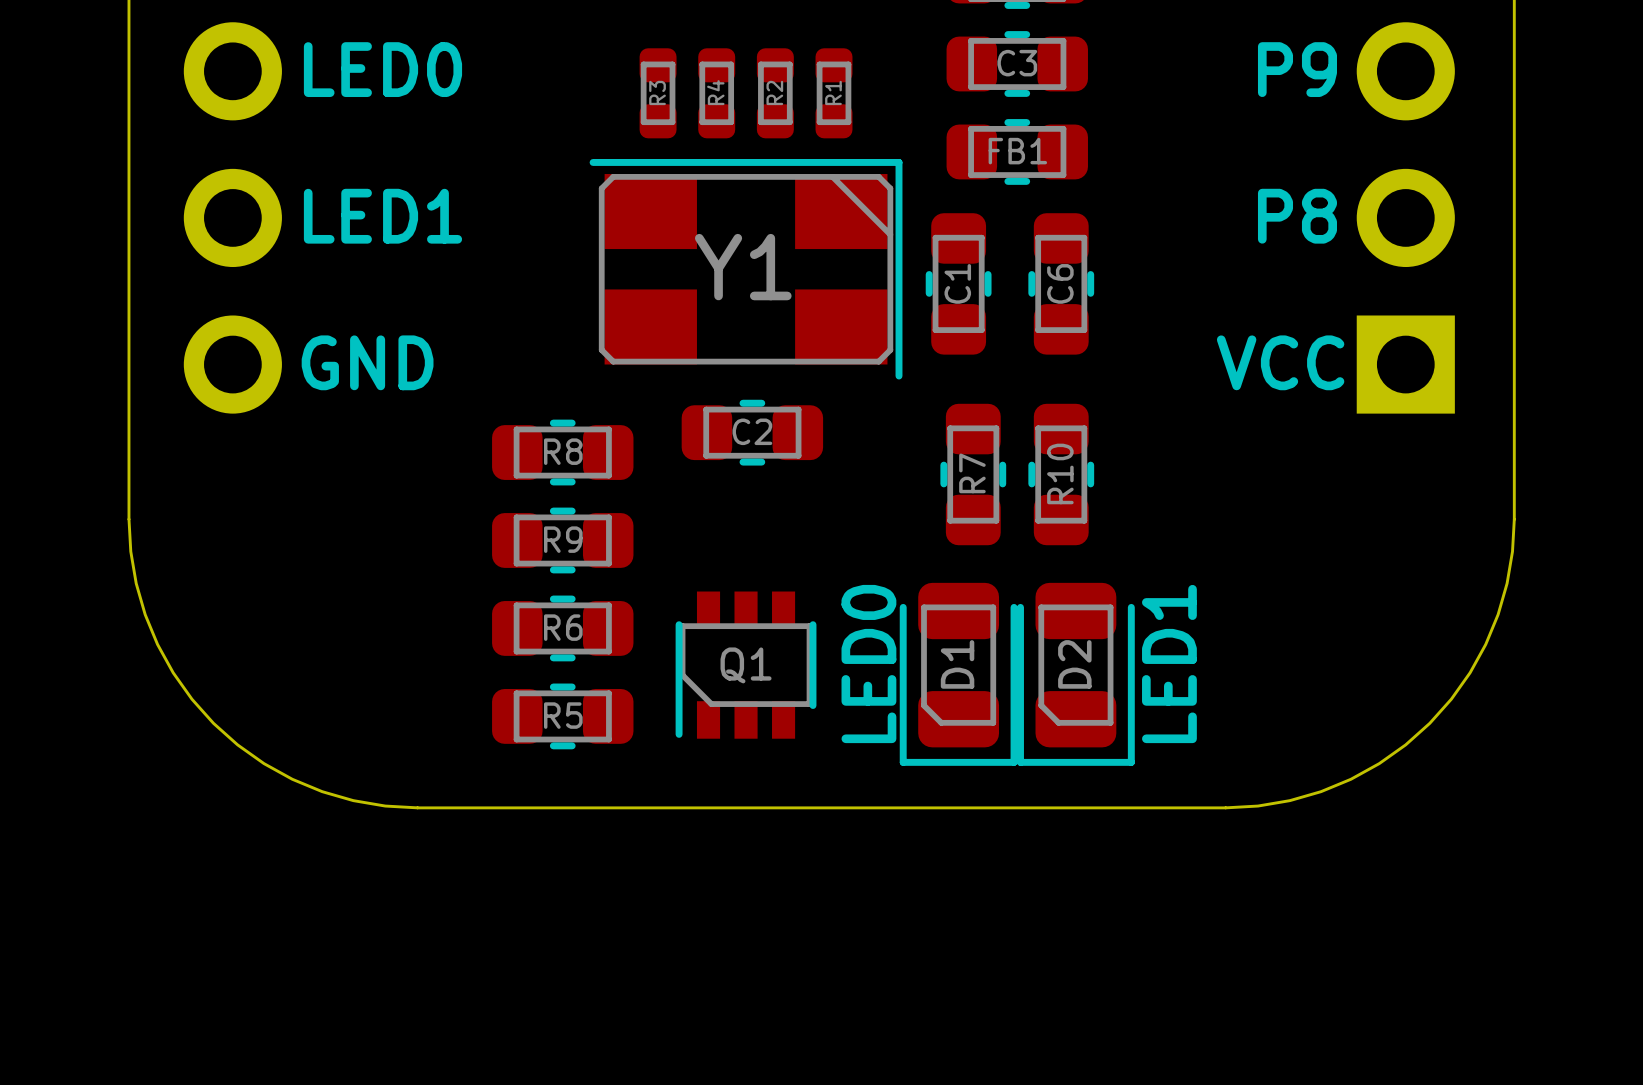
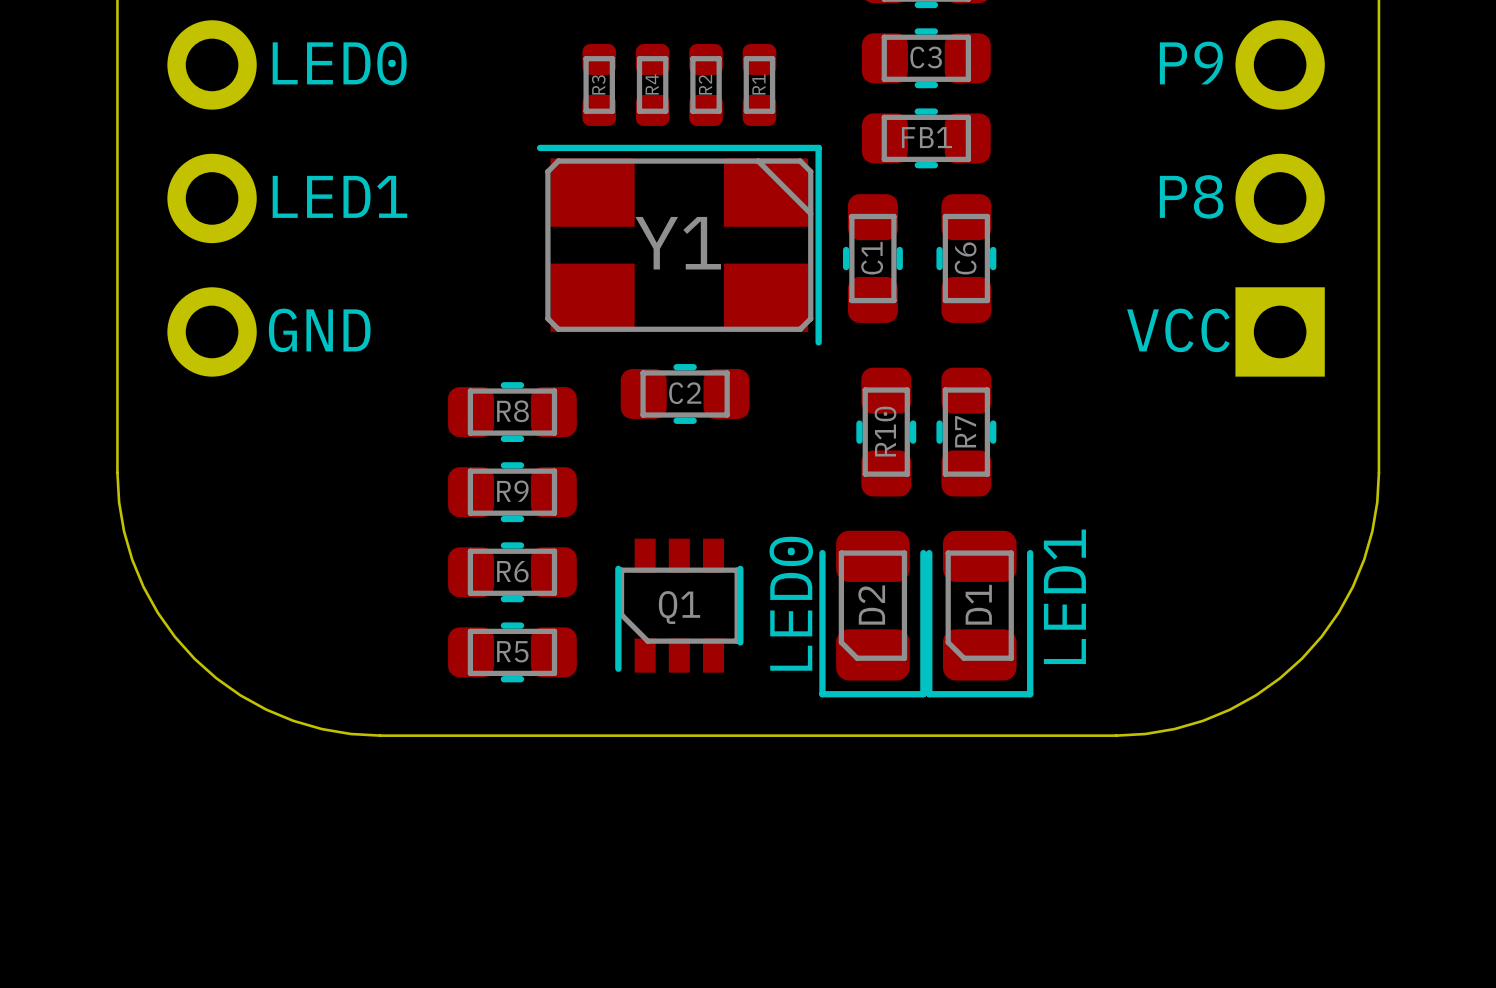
R7 name: R7 (972, 473) -> R10 (885, 431)
R10 name: R10 (1060, 473) -> R7 (965, 431)
text: none -> LED1 (1064, 596)
D1 name: D1 (957, 664) -> D2 (871, 605)
D2 name: D2 (1074, 664) -> D1 (978, 604)
D2 value: LED1 (1169, 664) -> none

